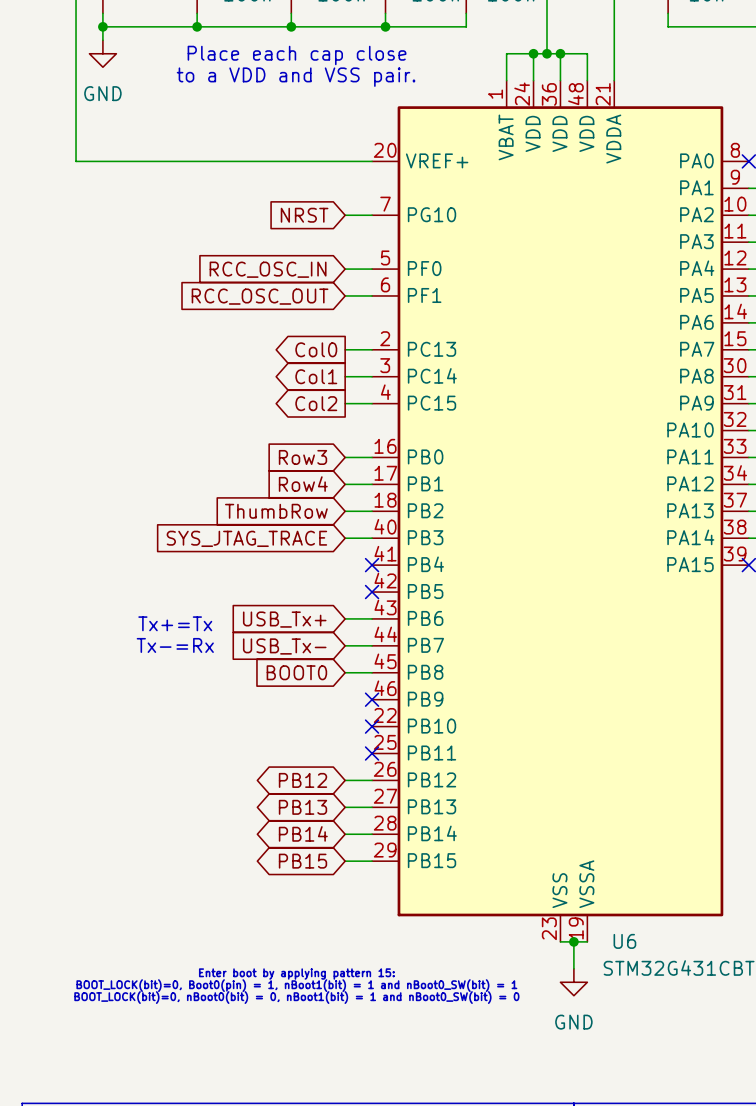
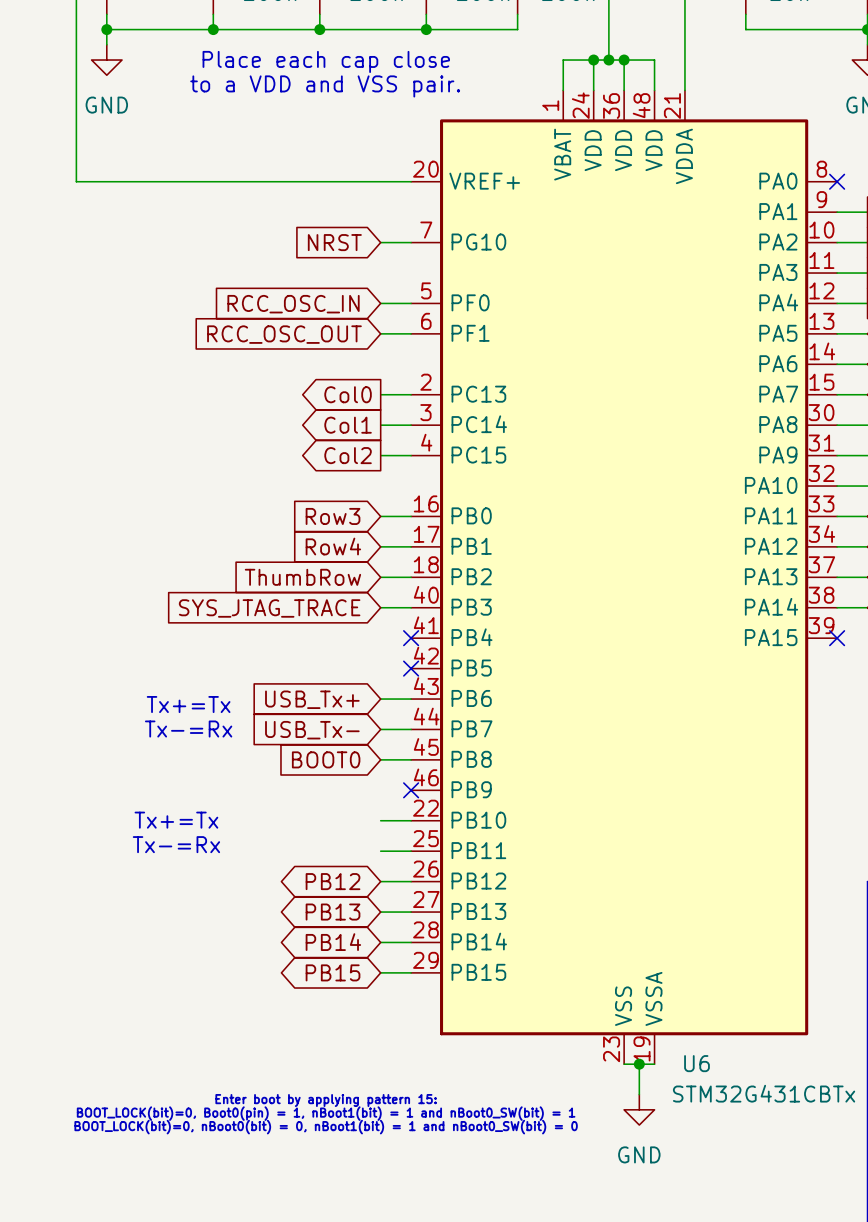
text: none -> Tx+=Tx (176, 820)
wire: none -> (380, 820) (411, 820)
no-connect mark: (372, 726) -> none
text: none -> Tx-=Rx (176, 844)
wire: none -> (380, 851) (411, 851)
no-connect mark: (372, 753) -> none

